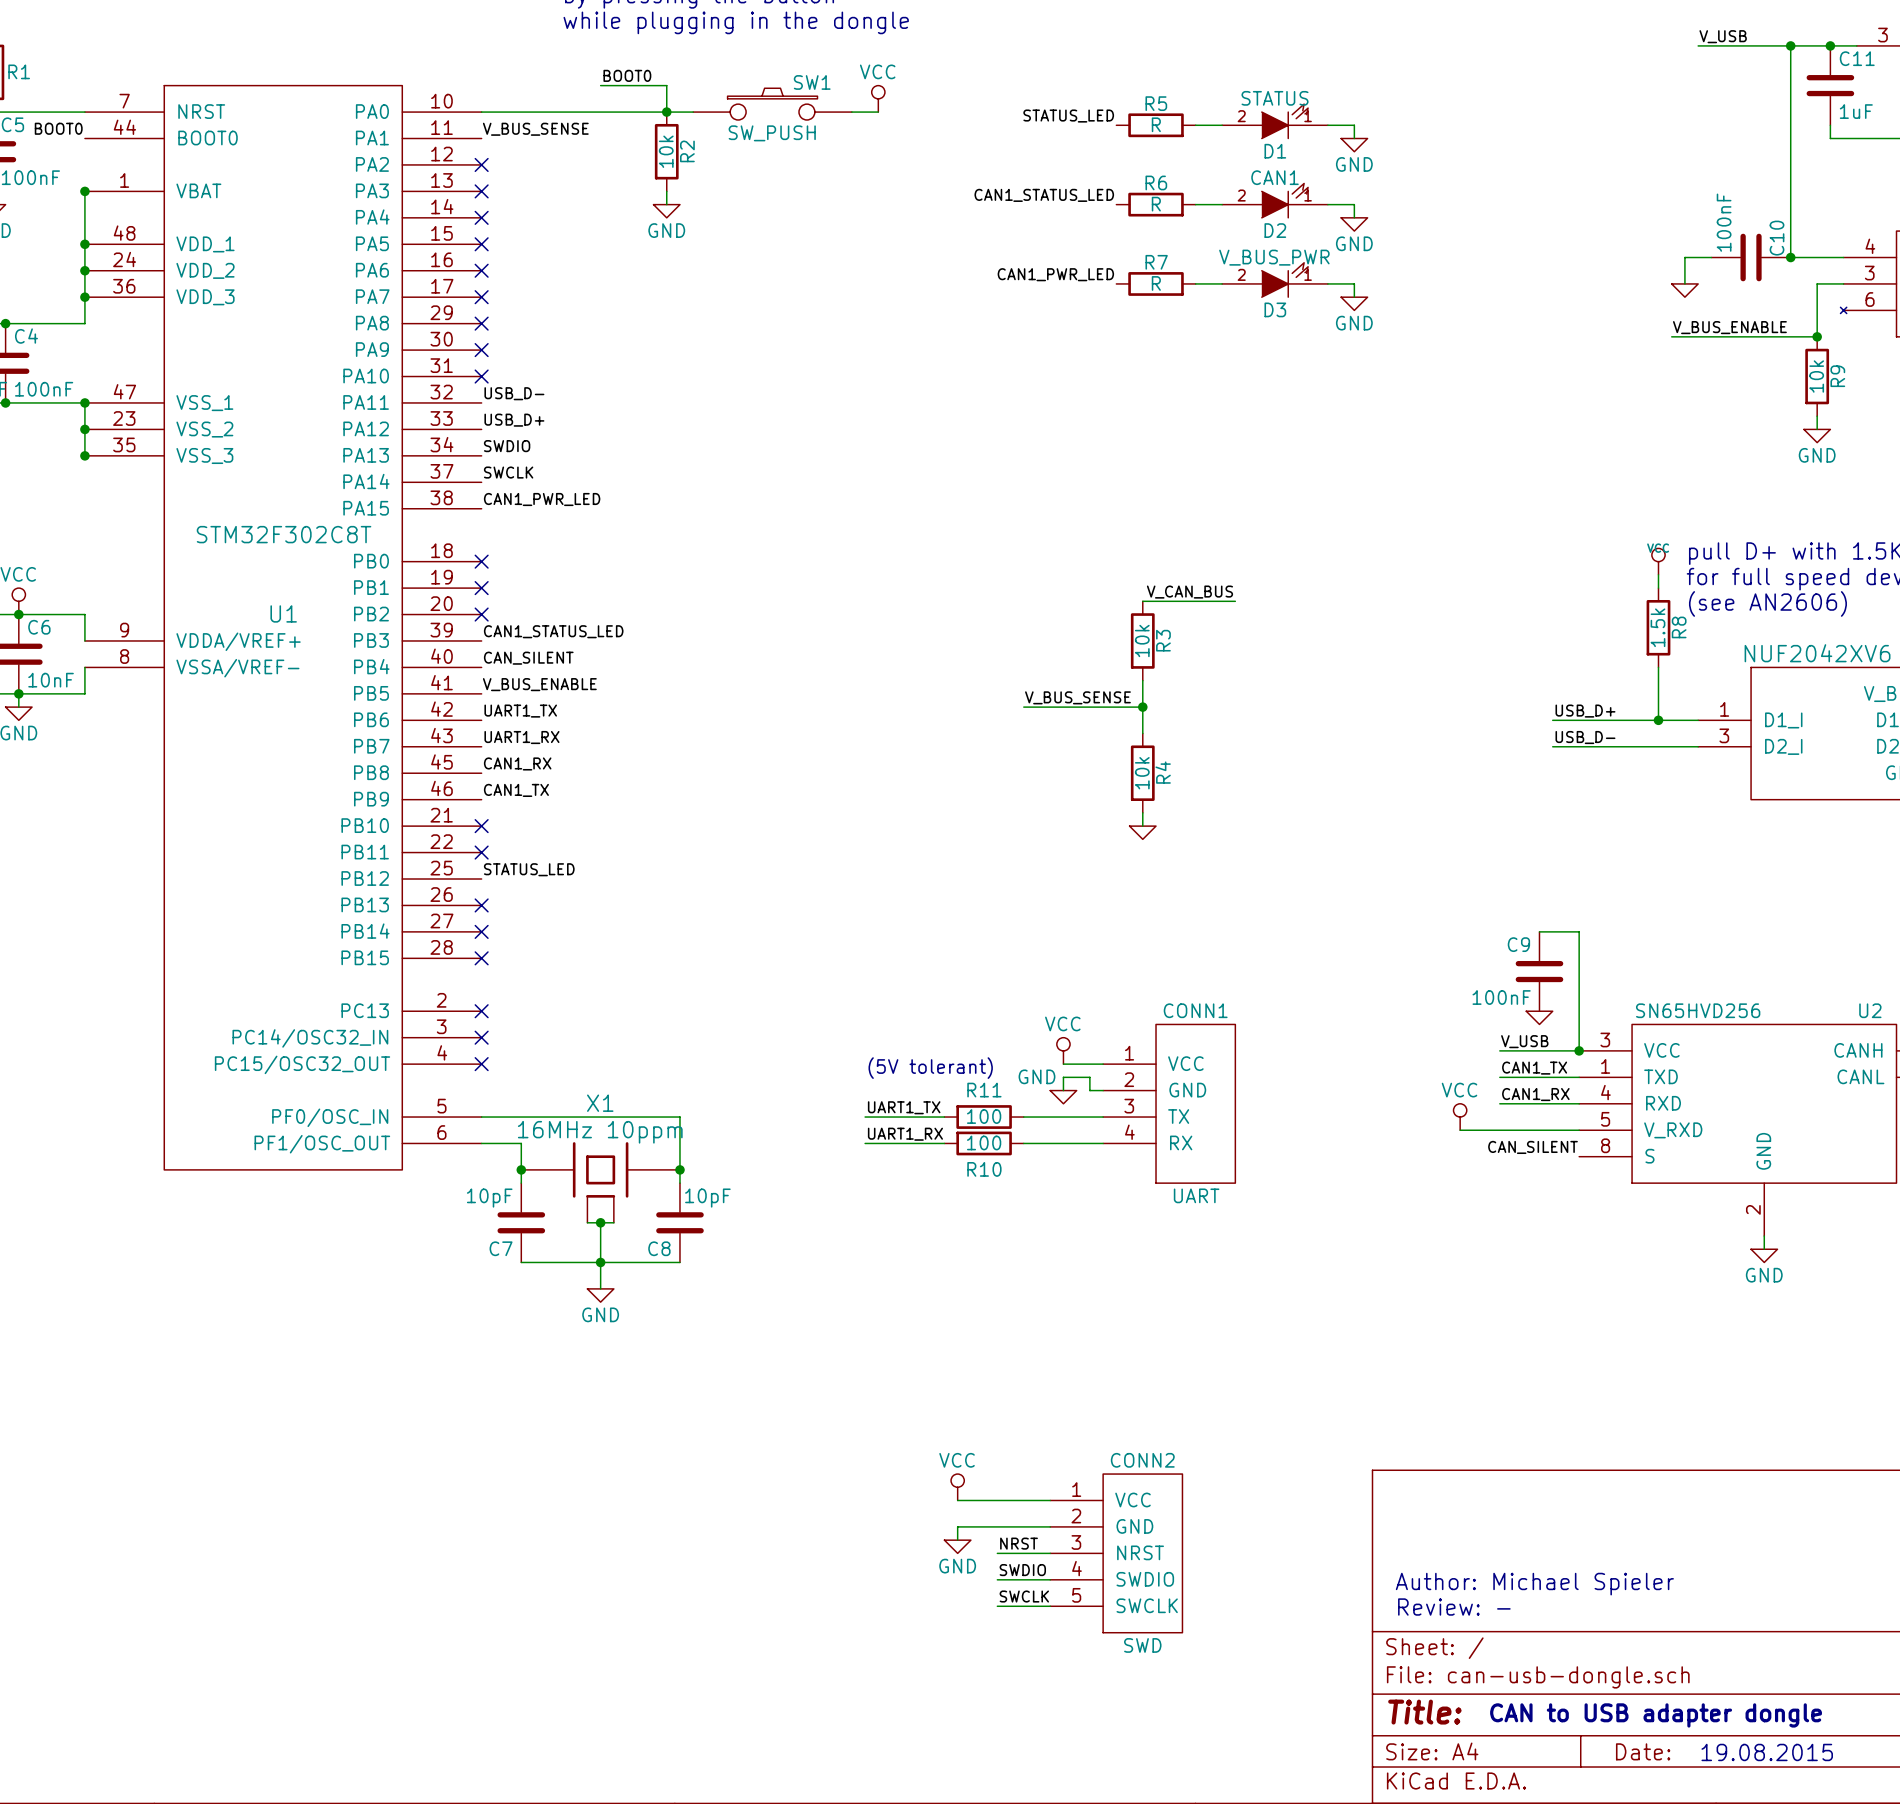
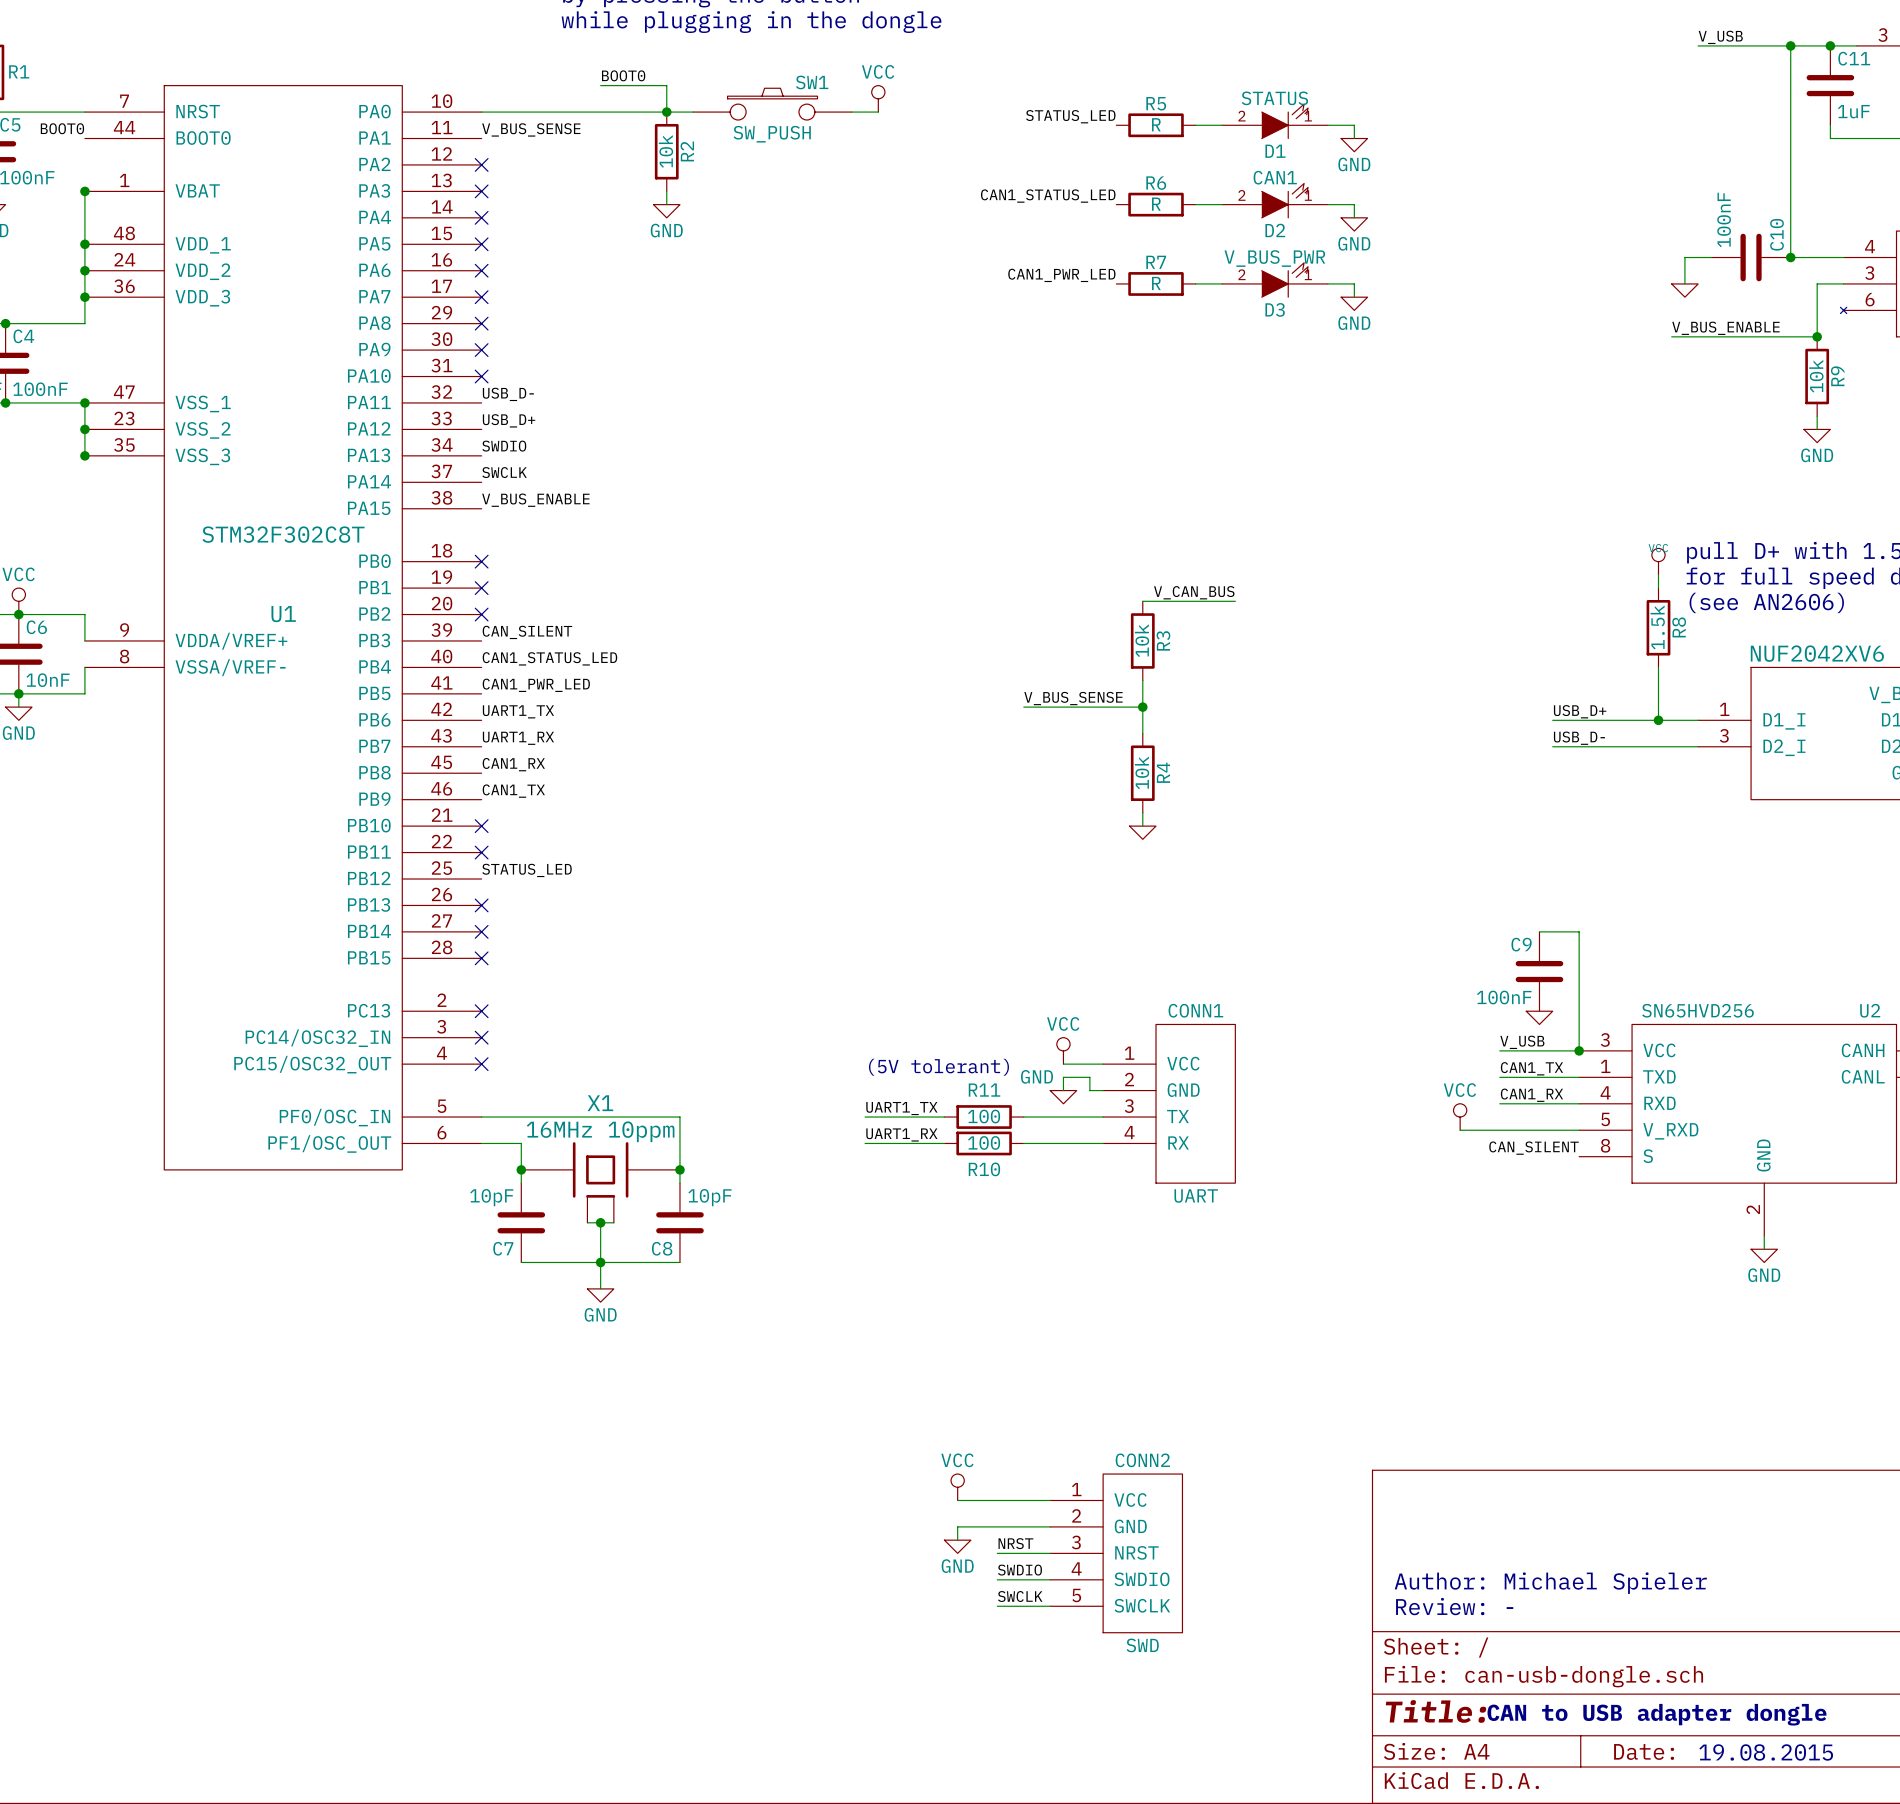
label: CAN1_PWR_LED (542, 499) -> V_BUS_ENABLE (535, 500)
label: CAN1_STATUS_LED (553, 631) -> CAN_SILENT (527, 632)
label: CAN_SILENT (528, 658) -> CAN1_STATUS_LED (549, 658)
label: V_BUS_ENABLE (539, 684) -> CAN1_PWR_LED (536, 685)

